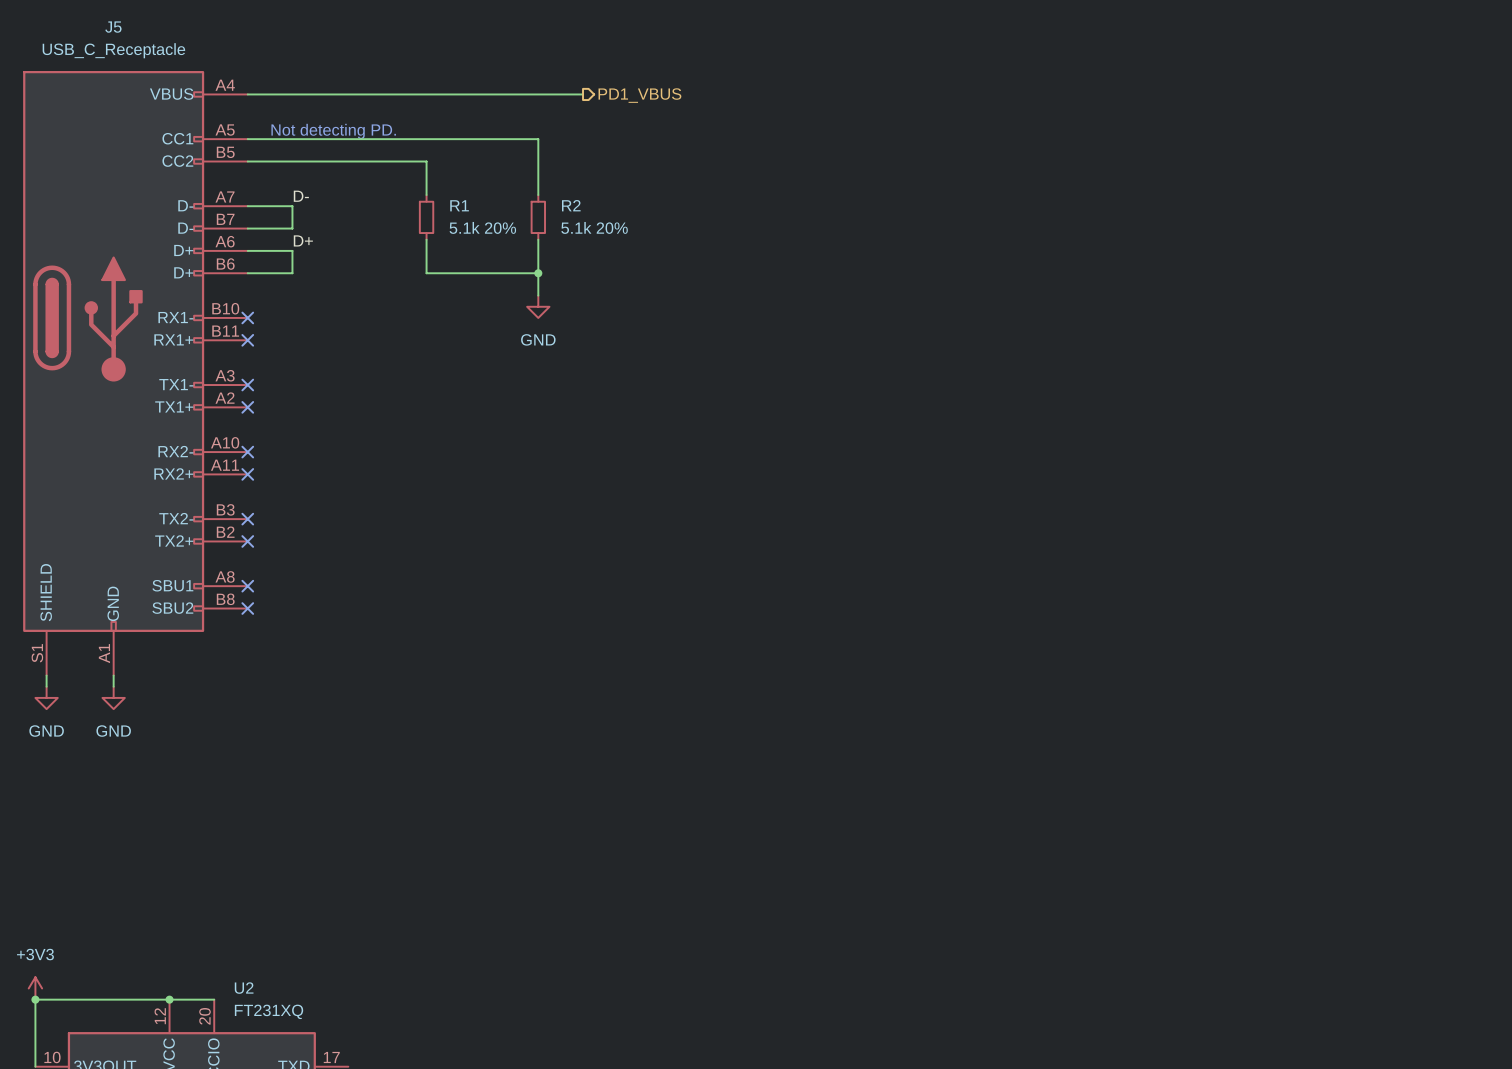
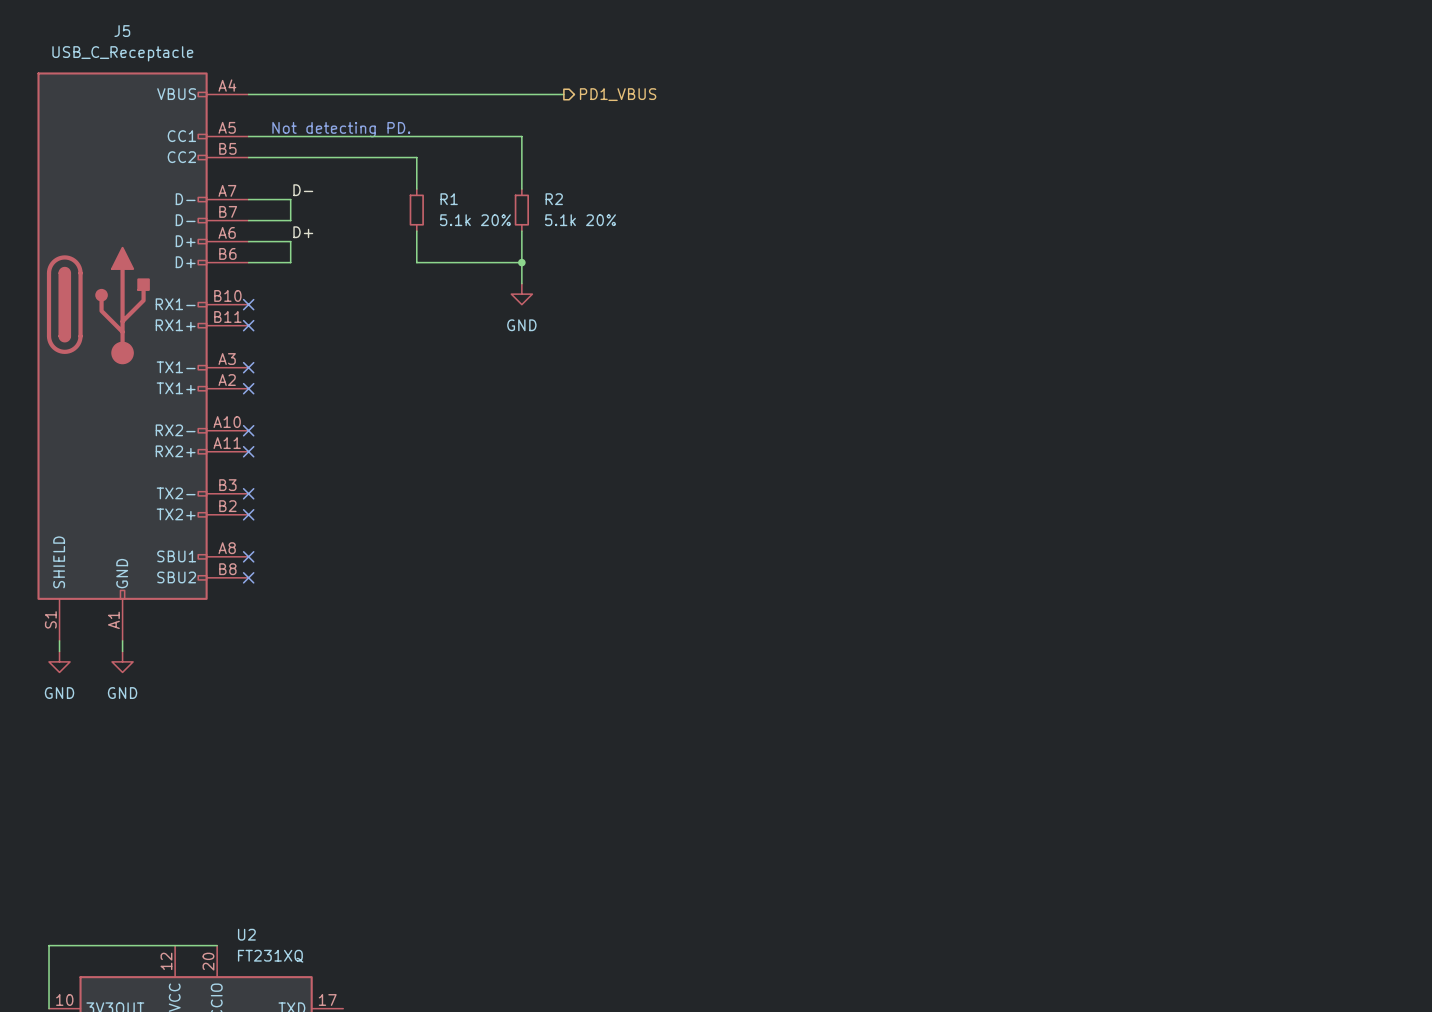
power symbol: +3V3 (35, 988) -> none
junction: (35, 999) -> none
junction: (169, 999) -> none

